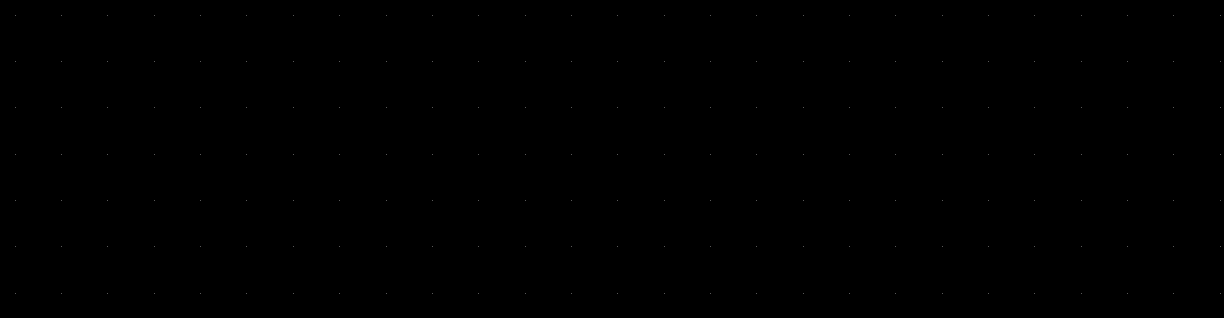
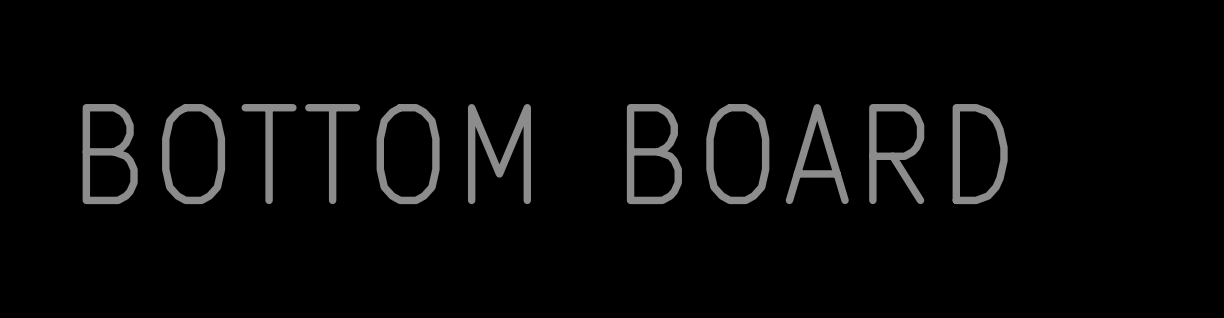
text: none -> BOTTOM BOARD (545, 154)

